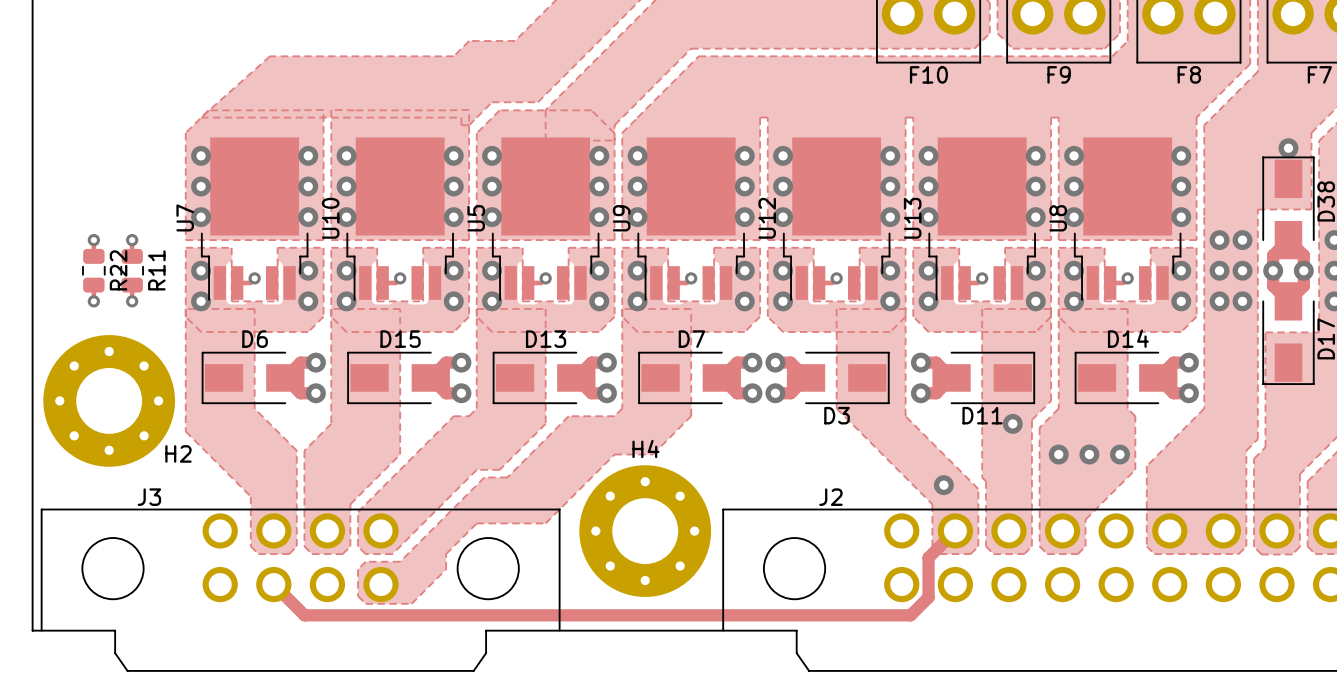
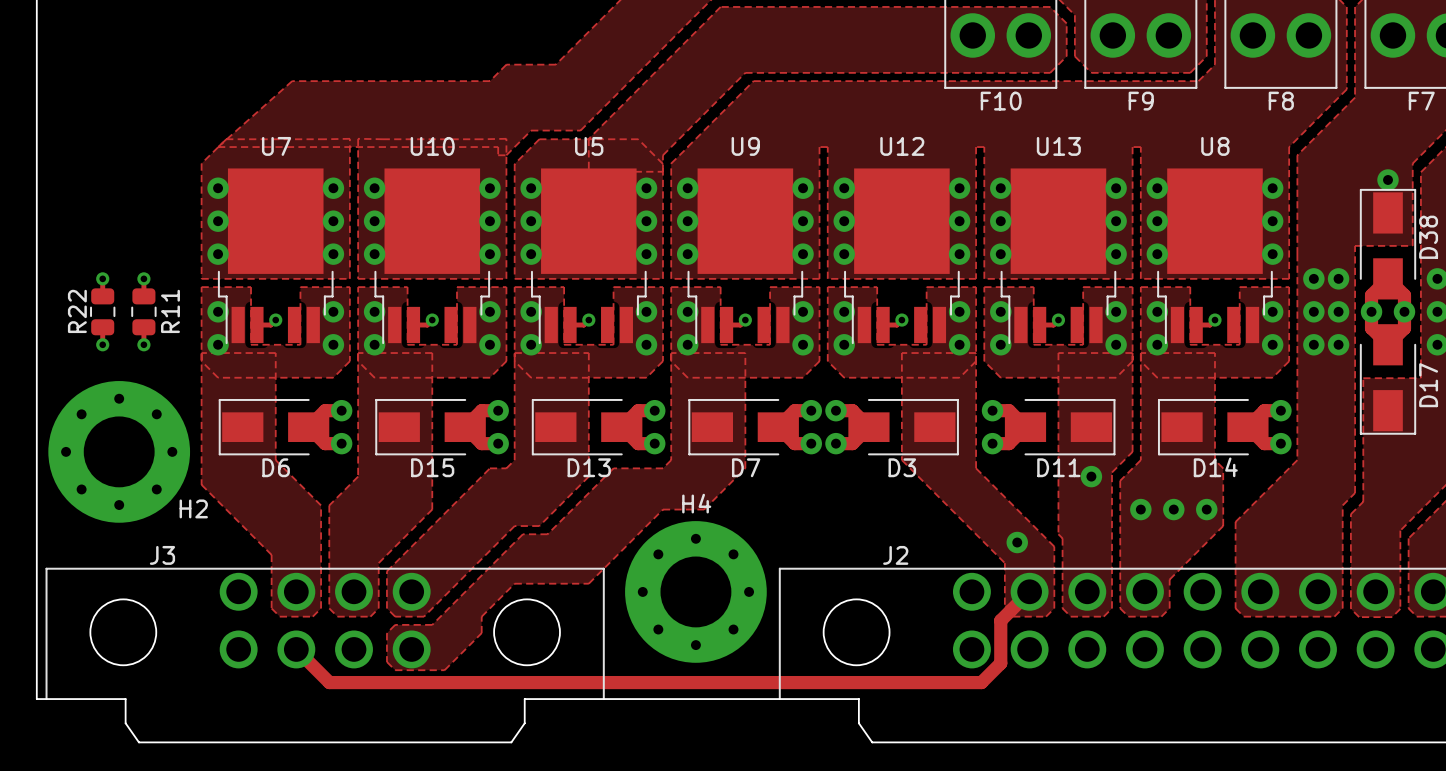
U7 name rotation: 0° (185, 217) -> 90° clockwise (276, 146)
U7 name position: U7 (185, 217) -> U7 (276, 146)
U10 name rotation: 0° (330, 218) -> 90° clockwise (432, 146)
U10 name position: U10 (330, 218) -> U10 (432, 146)
U5 name rotation: 0° (476, 218) -> 90° clockwise (589, 146)
U5 name position: U5 (476, 218) -> U5 (589, 146)
U9 name rotation: 0° (621, 218) -> 90° clockwise (745, 146)
U9 name position: U9 (621, 218) -> U9 (745, 146)
U12 name rotation: 0° (767, 218) -> 90° clockwise (902, 146)
U12 name position: U12 (767, 218) -> U12 (902, 146)
U13 name rotation: 0° (912, 218) -> 90° clockwise (1058, 146)
U13 name position: U13 (912, 218) -> U13 (1058, 146)
U8 name rotation: 0° (1058, 218) -> 90° clockwise (1215, 146)
U8 name position: U8 (1058, 218) -> U8 (1215, 146)
R22 name position: R22 (118, 270) -> R22 (77, 311)
D14 name position: D14 (1128, 338) -> D14 (1215, 467)
D6 name position: D6 (255, 339) -> D6 (276, 467)
D15 name position: D15 (400, 339) -> D15 (432, 467)
D13 name position: D13 (546, 339) -> D13 (589, 467)
D7 name position: D7 (691, 339) -> D7 (746, 467)

